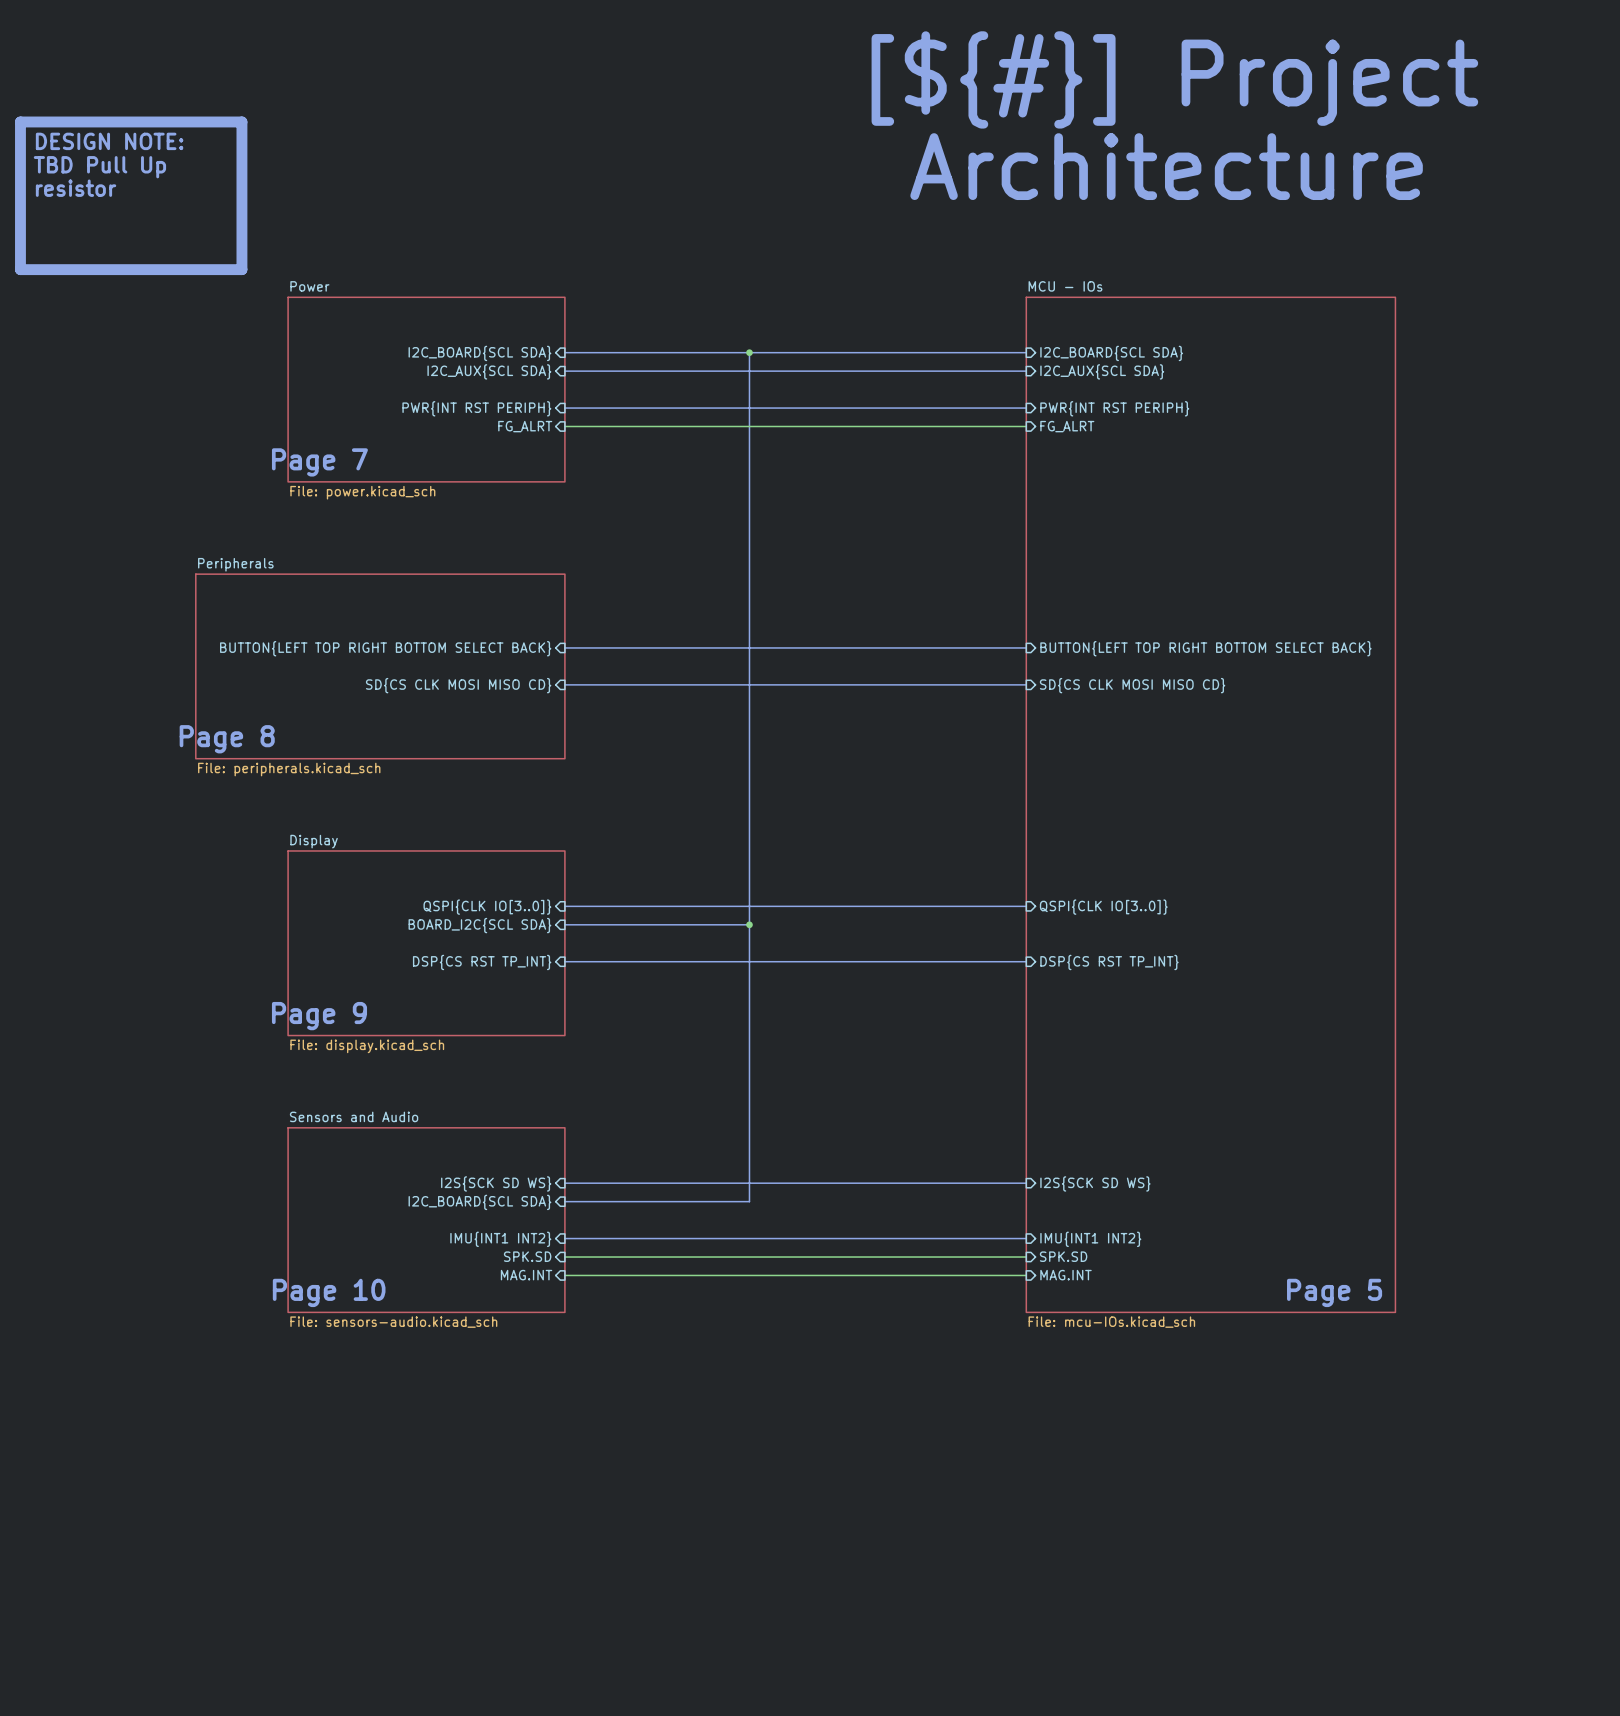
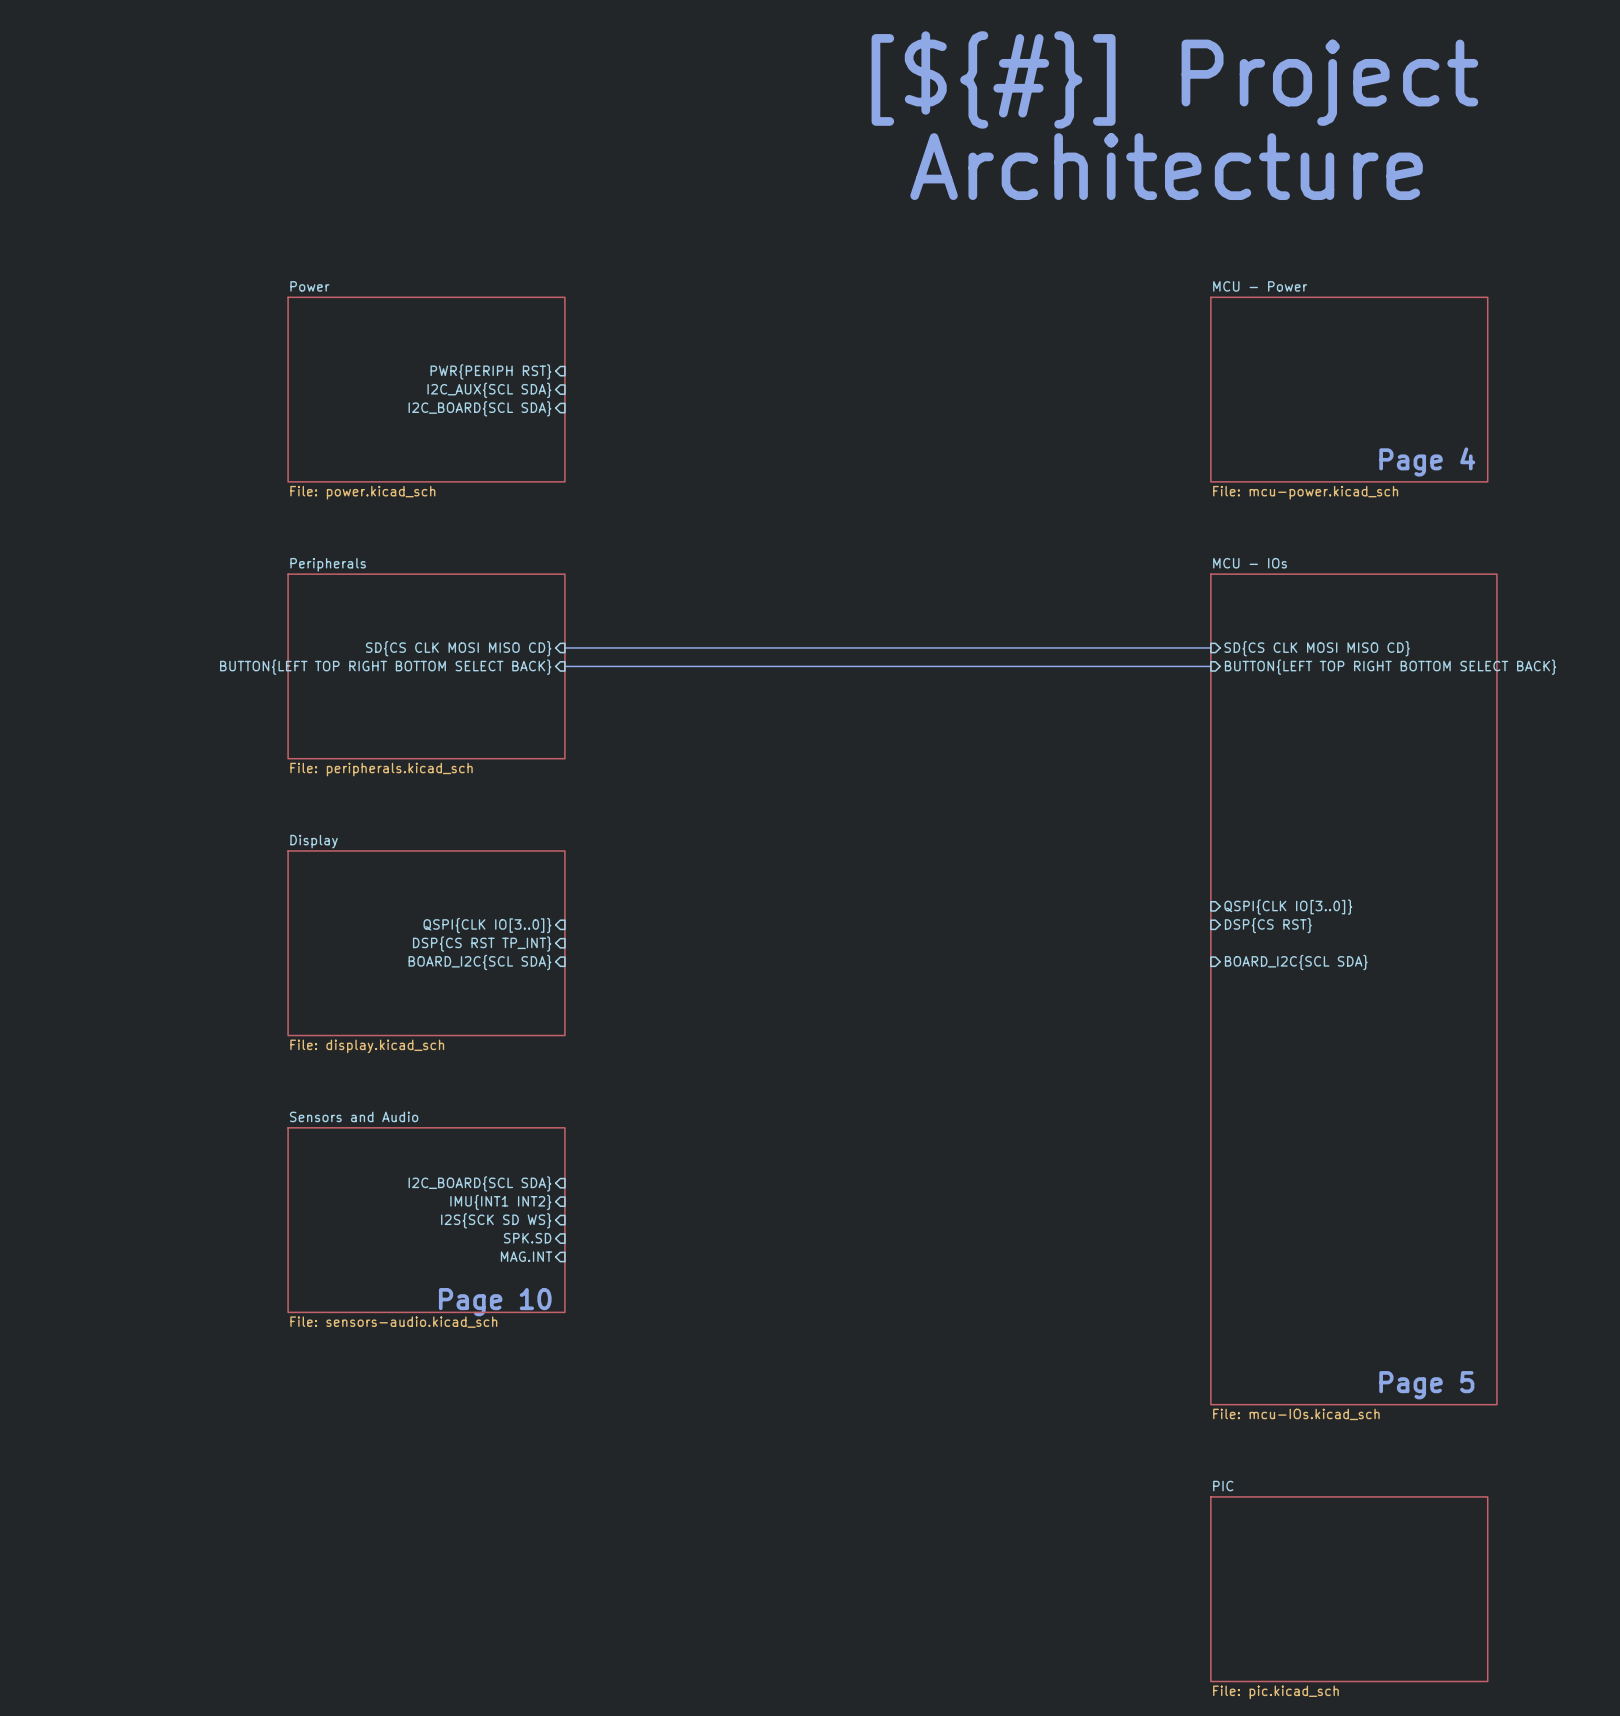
line: (20, 121) (241, 121) (241, 269) (20, 269) (20, 121) -> none
text: DESIGN NOTE: (109, 141) -> none
text: TBD Pull Up (99, 167) -> none
text: resistor (76, 188) -> none
bus: (564, 352) (1026, 352) -> none
bus: (749, 352) (749, 1201) (564, 1201) -> none
junction: (749, 352) -> none
sheet pin: I2C_BOARD{SCL SDA} (479, 353) -> none
sheet pin: I2C_BOARD{SCL SDA} (1111, 353) -> none
sheet pin: I2C_AUX{SCL SDA} (489, 371) -> PWR{PERIPH RST} (490, 371)
bus: (564, 371) (1026, 371) -> none
sheet pin: I2C_AUX{SCL SDA} (1102, 371) -> none
sheet MCU - Power: none -> File: mcu-power.kicad_sch (1349, 389)
sheet pin: none -> I2C_AUX{SCL SDA} (489, 390)
sheet pin: PWR{INT RST PERIPH} (476, 408) -> I2C_BOARD{SCL SDA} (479, 408)
bus: (564, 408) (1026, 408) -> none
sheet pin: PWR{INT RST PERIPH} (1114, 408) -> none
sheet pin: FG_ALRT (525, 426) -> none
wire: (564, 426) (1026, 426) -> none
sheet pin: FG_ALRT (1067, 426) -> none
text: none -> Page 4 (1427, 461)
text: Page 7 (319, 462) -> none
bus: none -> (1026, 647) (1210, 647)
sheet pin: BUTTON{LEFT TOP RIGHT BOTTOM SELECT BACK} (385, 648) -> SD{CS CLK MOSI MISO CD} (458, 648)
sheet pin: BUTTON{LEFT TOP RIGHT BOTTOM SELECT BACK} (1205, 648) -> none
sheet pin: none -> SD{CS CLK MOSI MISO CD} (1317, 648)
sheet Peripherals: File: peripherals.kicad_sch (380, 666) -> none
sheet Peripherals: none -> File: peripherals.kicad_sch (426, 666)
bus: none -> (564, 666) (1210, 666)
sheet pin: none -> BUTTON{LEFT TOP RIGHT BOTTOM SELECT BACK} (385, 667)
sheet pin: none -> BUTTON{LEFT TOP RIGHT BOTTOM SELECT BACK} (1390, 667)
bus: (564, 684) (1026, 684) -> none
sheet pin: SD{CS CLK MOSI MISO CD} (458, 685) -> none
sheet pin: SD{CS CLK MOSI MISO CD} (1132, 685) -> none
text: Page 8 (227, 739) -> none
sheet MCU - IOs: File: mcu-IOs.kicad_sch (1210, 804) -> none
bus: (564, 906) (1026, 906) -> none
sheet pin: QSPI{CLK IO[3..0]} (487, 907) -> none
sheet pin: QSPI{CLK IO[3..0]} (1103, 907) -> none
sheet pin: none -> QSPI{CLK IO[3..0]} (1288, 907)
bus: (564, 924) (749, 924) -> none
junction: (749, 924) -> none
sheet pin: BOARD_I2C{SCL SDA} (479, 925) -> QSPI{CLK IO[3..0]} (487, 925)
sheet pin: none -> DSP{CS RST} (1268, 925)
sheet pin: none -> DSP{CS RST TP_INT} (482, 944)
bus: (564, 961) (1026, 961) -> none
sheet pin: DSP{CS RST TP_INT} (482, 962) -> BOARD_I2C{SCL SDA} (479, 962)
sheet pin: DSP{CS RST TP_INT} (1109, 962) -> none
sheet pin: none -> BOARD_I2C{SCL SDA} (1296, 962)
sheet MCU - IOs: none -> File: mcu-IOs.kicad_sch (1353, 989)
text: Page 9 (319, 1016) -> none
sheet pin: I2S{SCK SD WS} (496, 1183) -> I2C_BOARD{SCL SDA} (479, 1183)
bus: (564, 1183) (1026, 1183) -> none
sheet pin: I2S{SCK SD WS} (1095, 1183) -> none
sheet pin: I2C_BOARD{SCL SDA} (479, 1202) -> IMU{INT1 INT2} (500, 1202)
sheet pin: none -> I2S{SCK SD WS} (496, 1220)
bus: (564, 1238) (1026, 1238) -> none
sheet pin: IMU{INT1 INT2} (500, 1239) -> SPK.SD (527, 1238)
sheet pin: IMU{INT1 INT2} (1090, 1239) -> none
sheet pin: SPK.SD (527, 1256) -> MAG.INT (526, 1256)
sheet pin: SPK.SD (1063, 1256) -> none
wire: (564, 1257) (1026, 1257) -> none
sheet pin: MAG.INT (526, 1275) -> none
wire: (564, 1275) (1026, 1275) -> none
sheet pin: MAG.INT (1066, 1275) -> none
text position: Page 10 (329, 1292) -> Page 10 (495, 1302)
text position: Page 5 (1334, 1292) -> Page 5 (1426, 1385)
sheet PIC: none -> File: pic.kicad_sch (1349, 1589)

